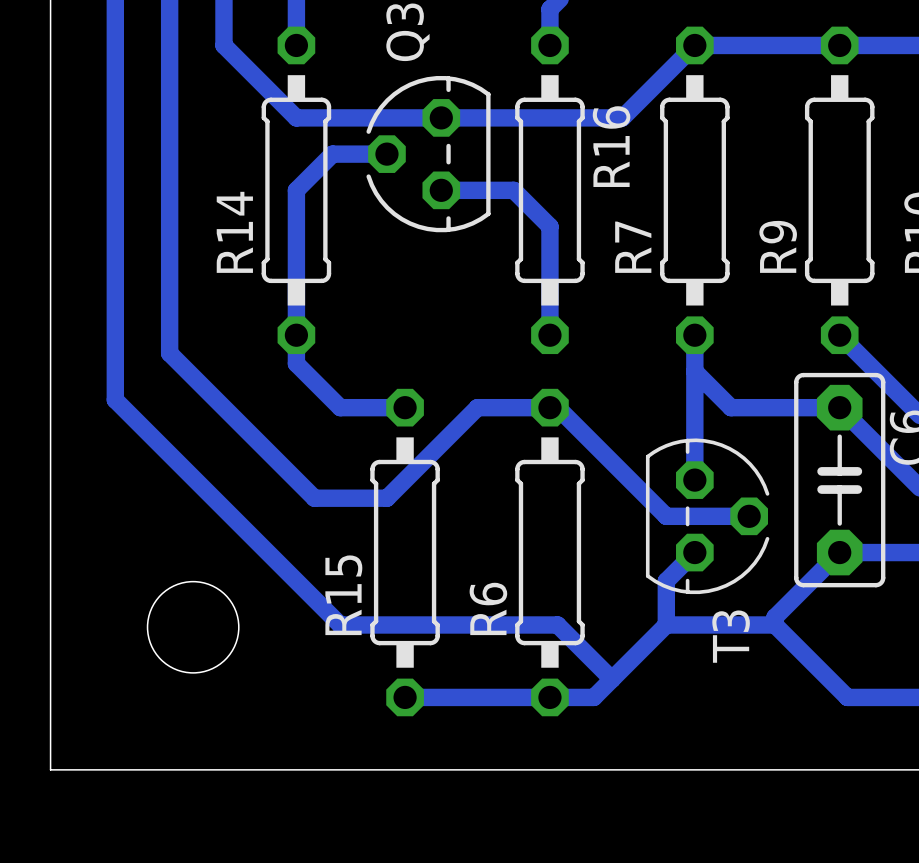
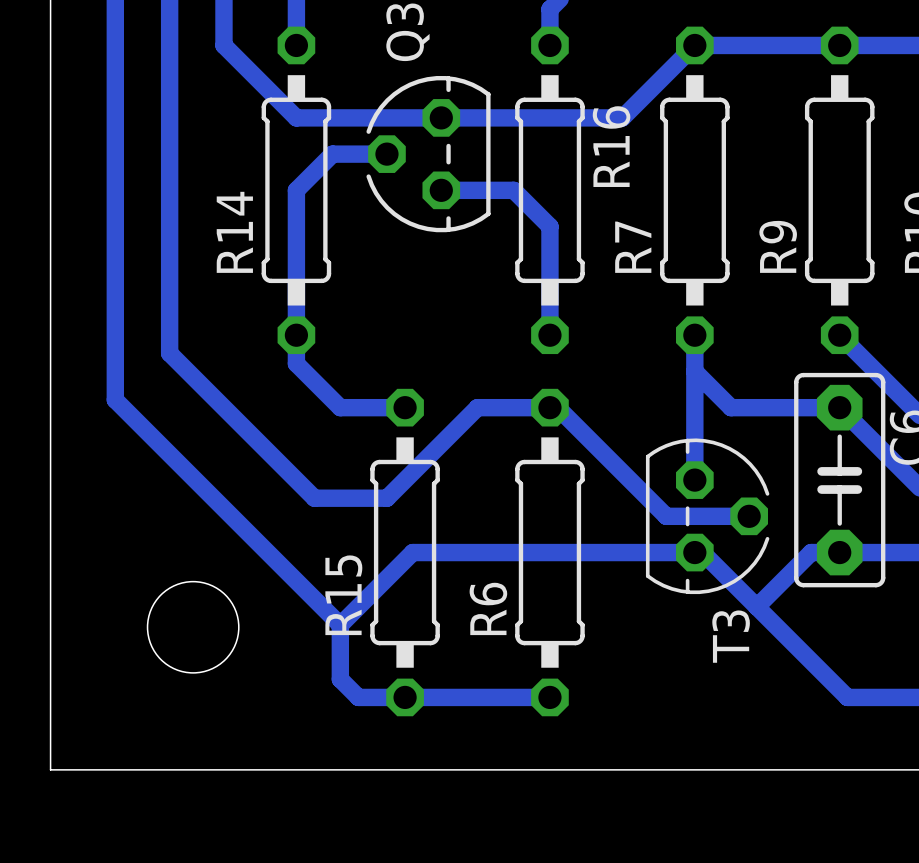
bottom track: (694, 552) (666, 581) (666, 624) -> none
bottom track: (839, 552) (774, 617) (774, 624) (666, 624) -> (839, 552) (811, 552) (756, 606)
bottom track: (340, 624) (557, 624) (611, 679) -> none
bottom track: (666, 624) (593, 697) (549, 697) -> none
bottom track: none -> (774, 624) (702, 552) (412, 552) (340, 624) (340, 679) (358, 697) (405, 697)

